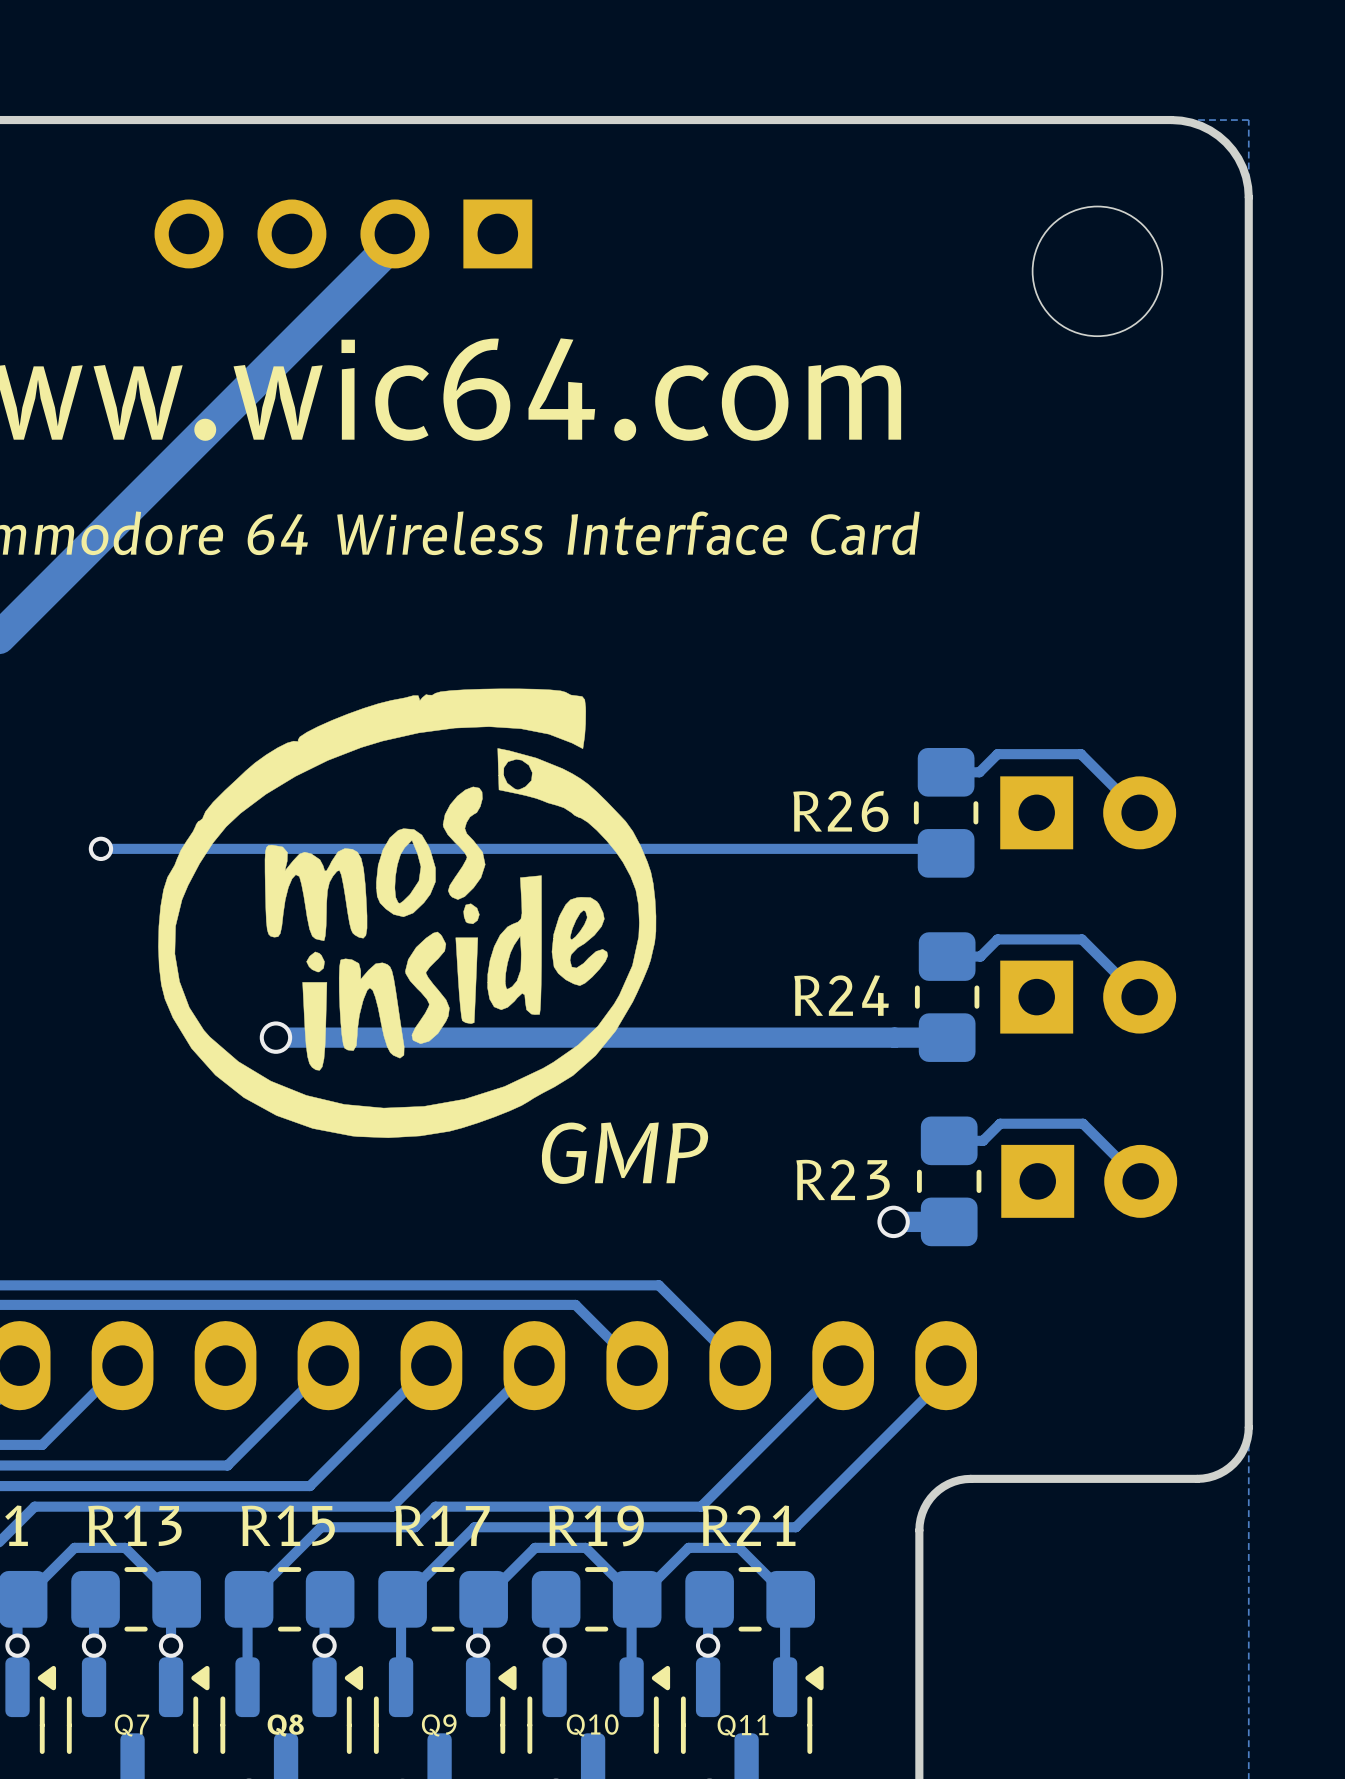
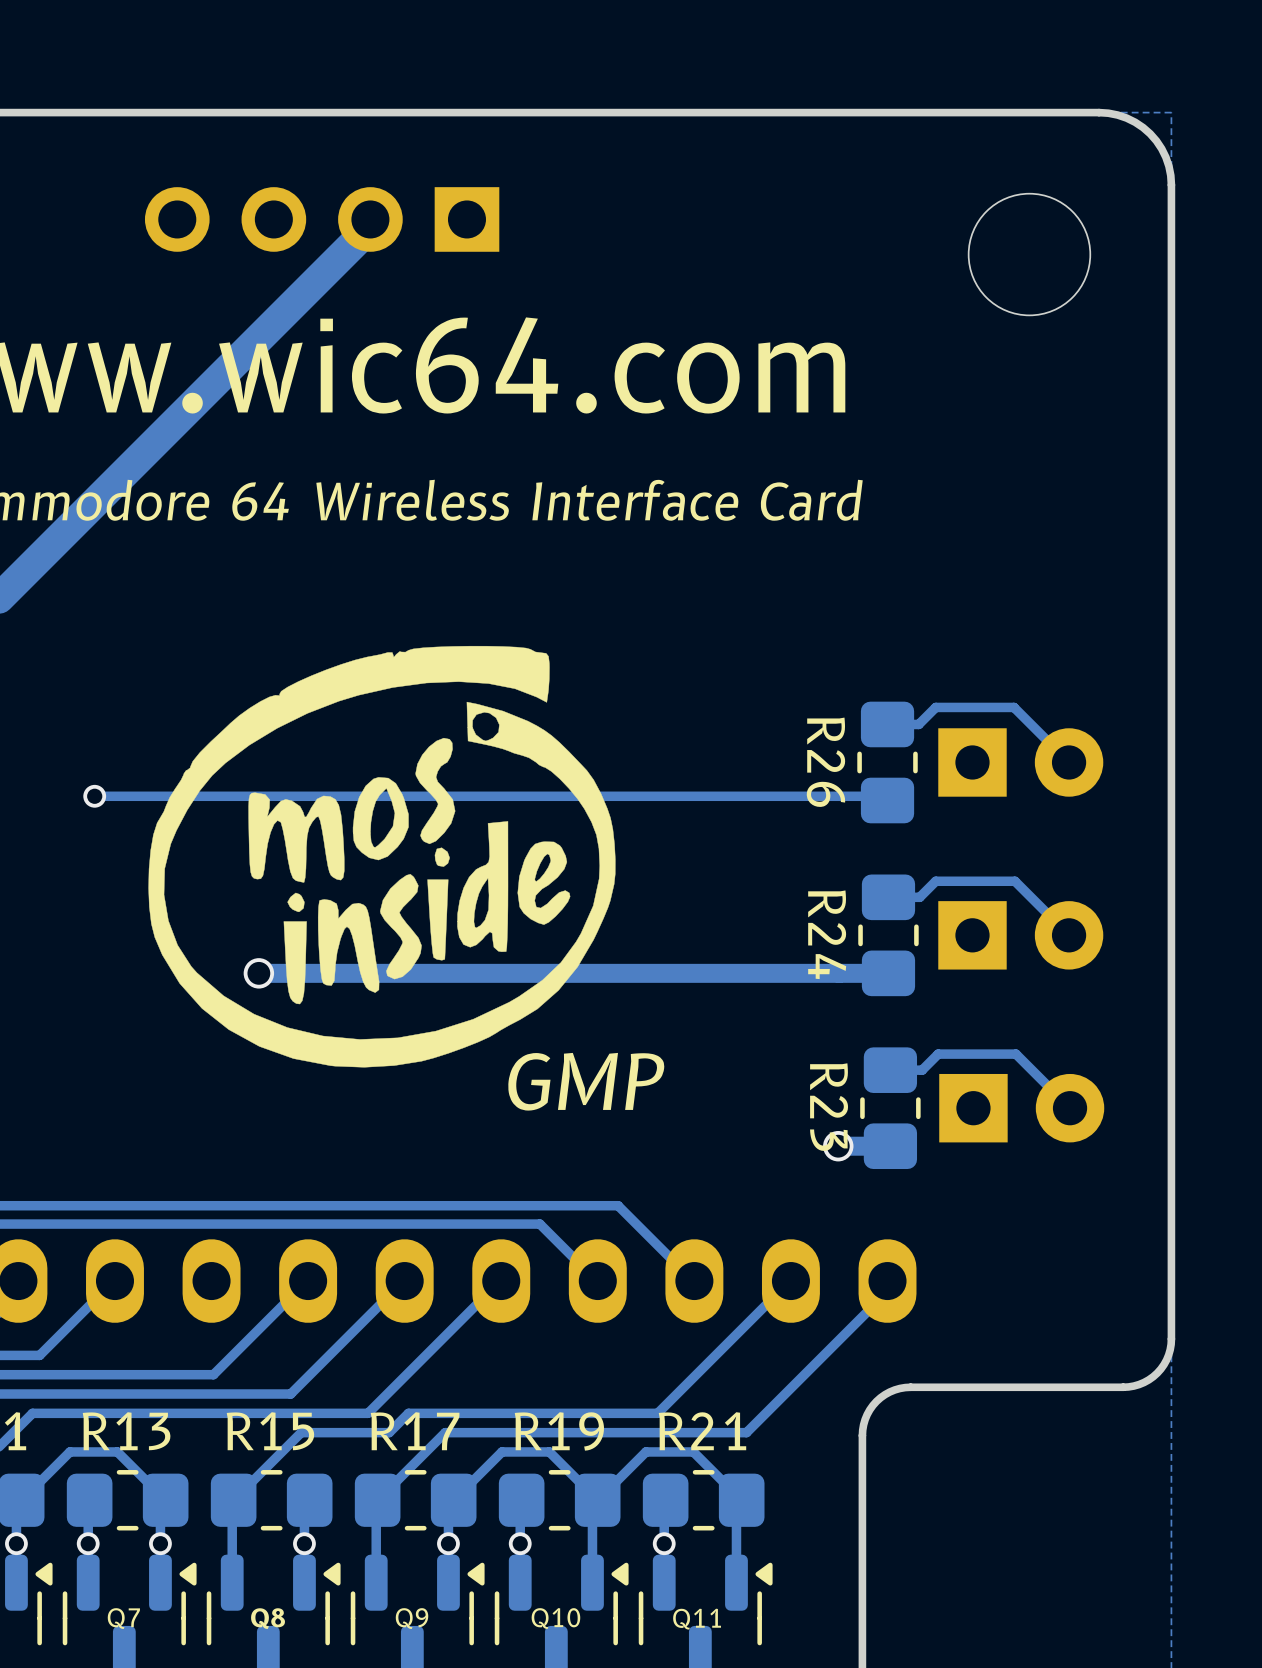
R26 name rotation: 0° (840, 811) -> 90° clockwise (825, 762)
R24 name rotation: 0° (841, 995) -> 90° clockwise (827, 934)
R23 name rotation: 0° (843, 1179) -> 90° clockwise (829, 1107)

